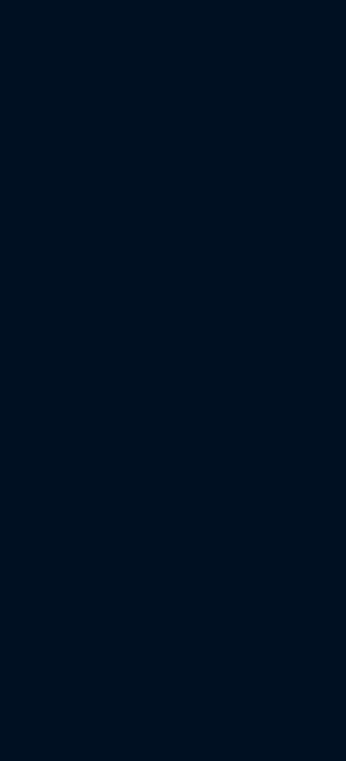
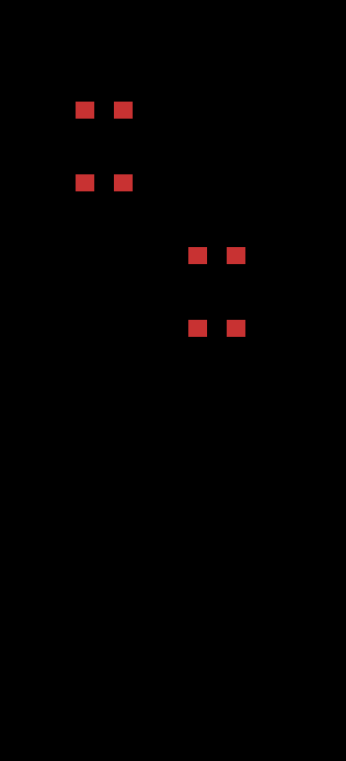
part: none -> (104, 110)
part: none -> (104, 182)
part: none -> (216, 255)
part: none -> (216, 328)

